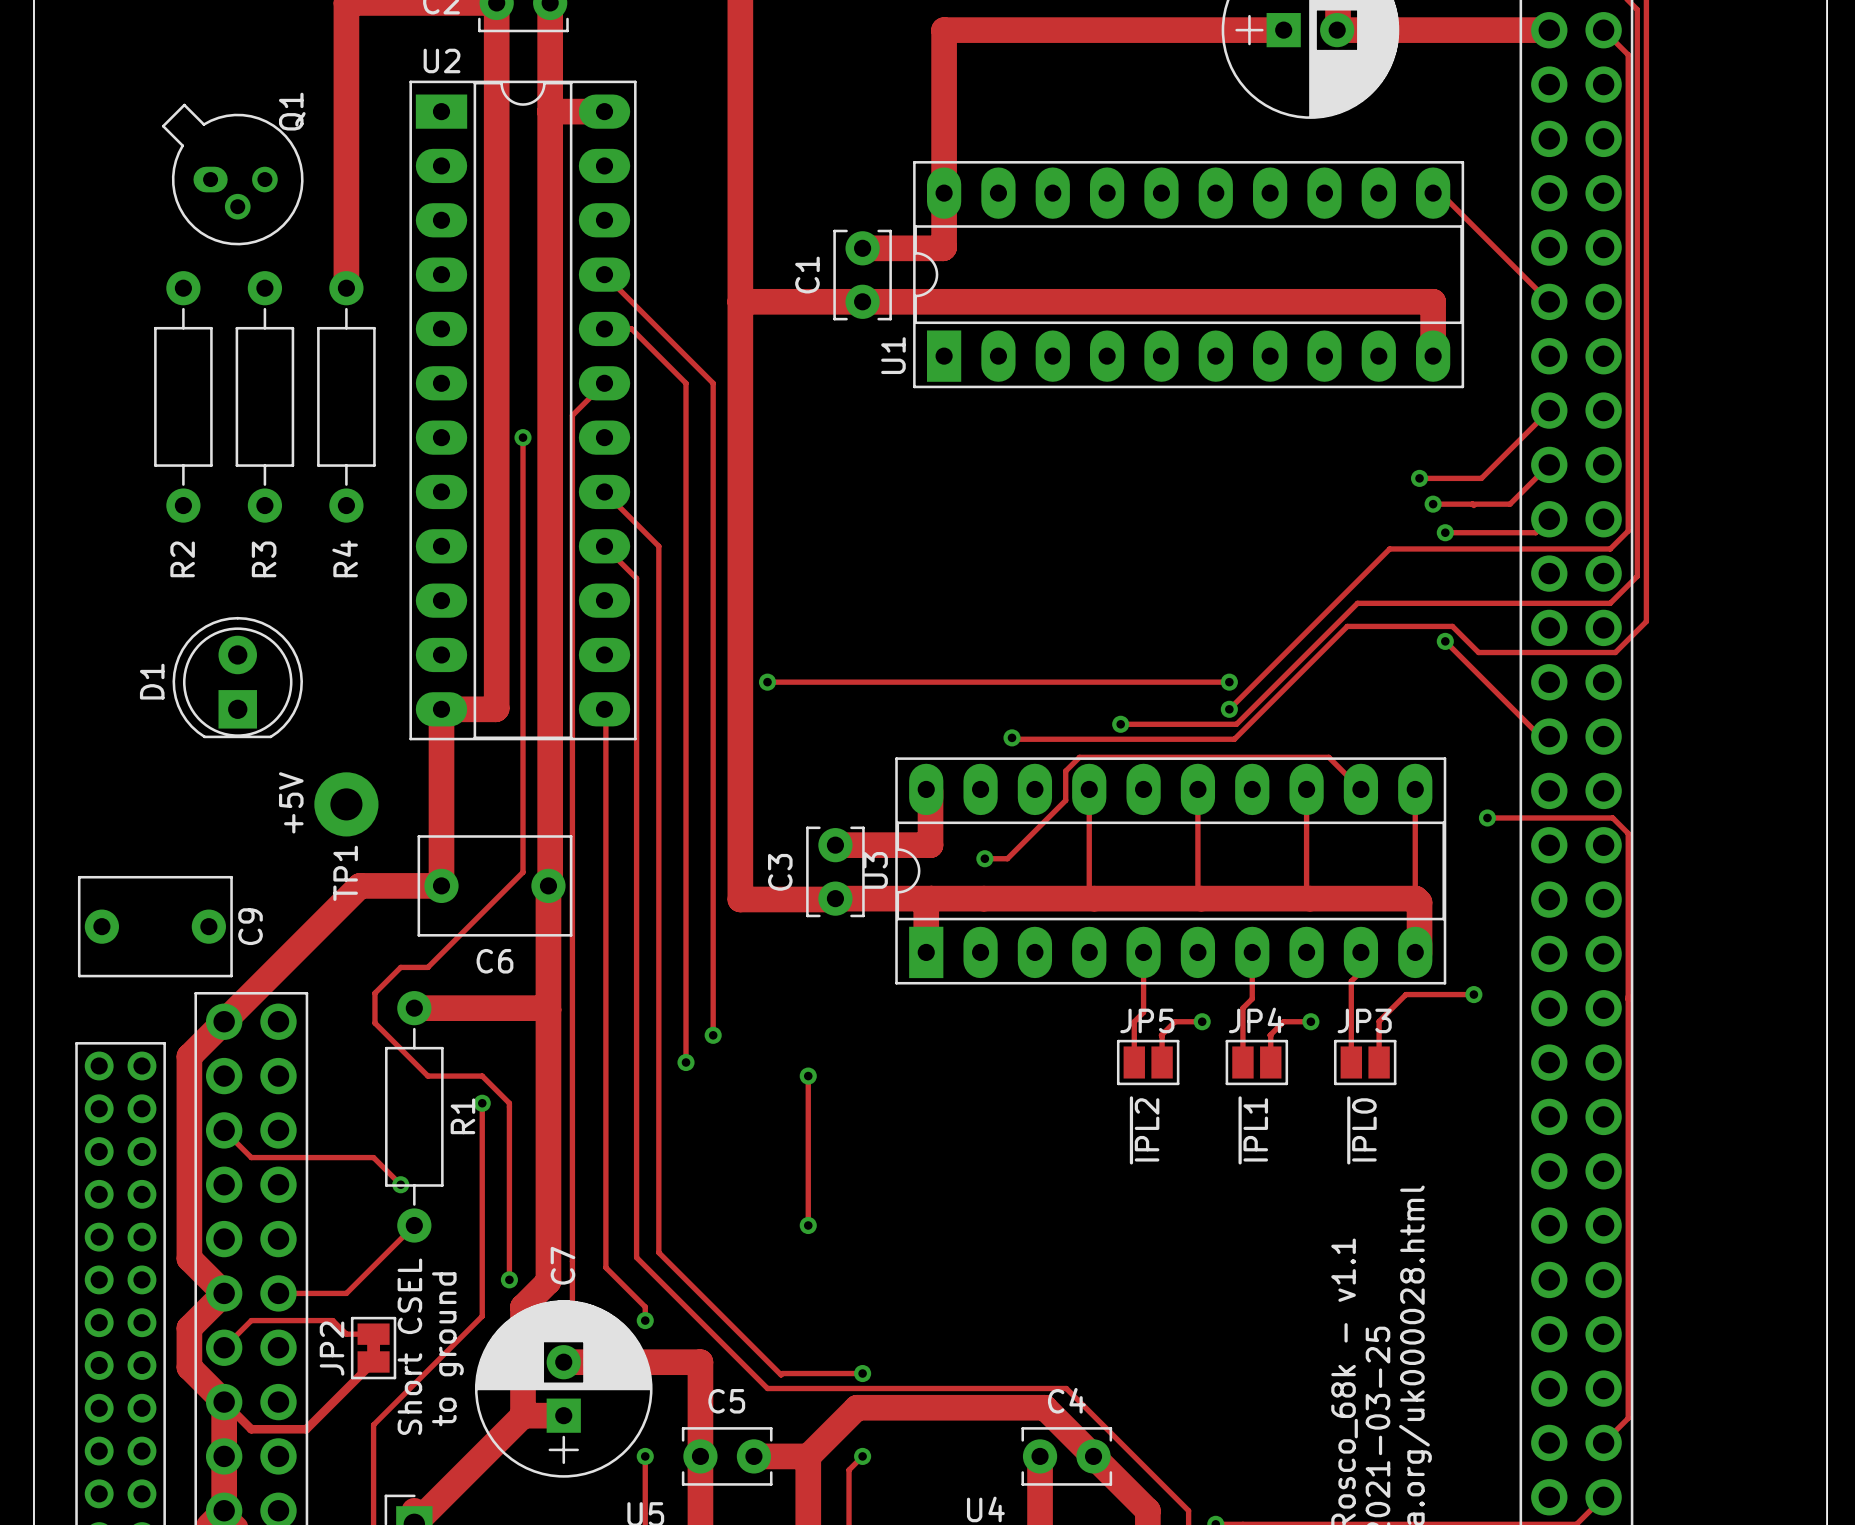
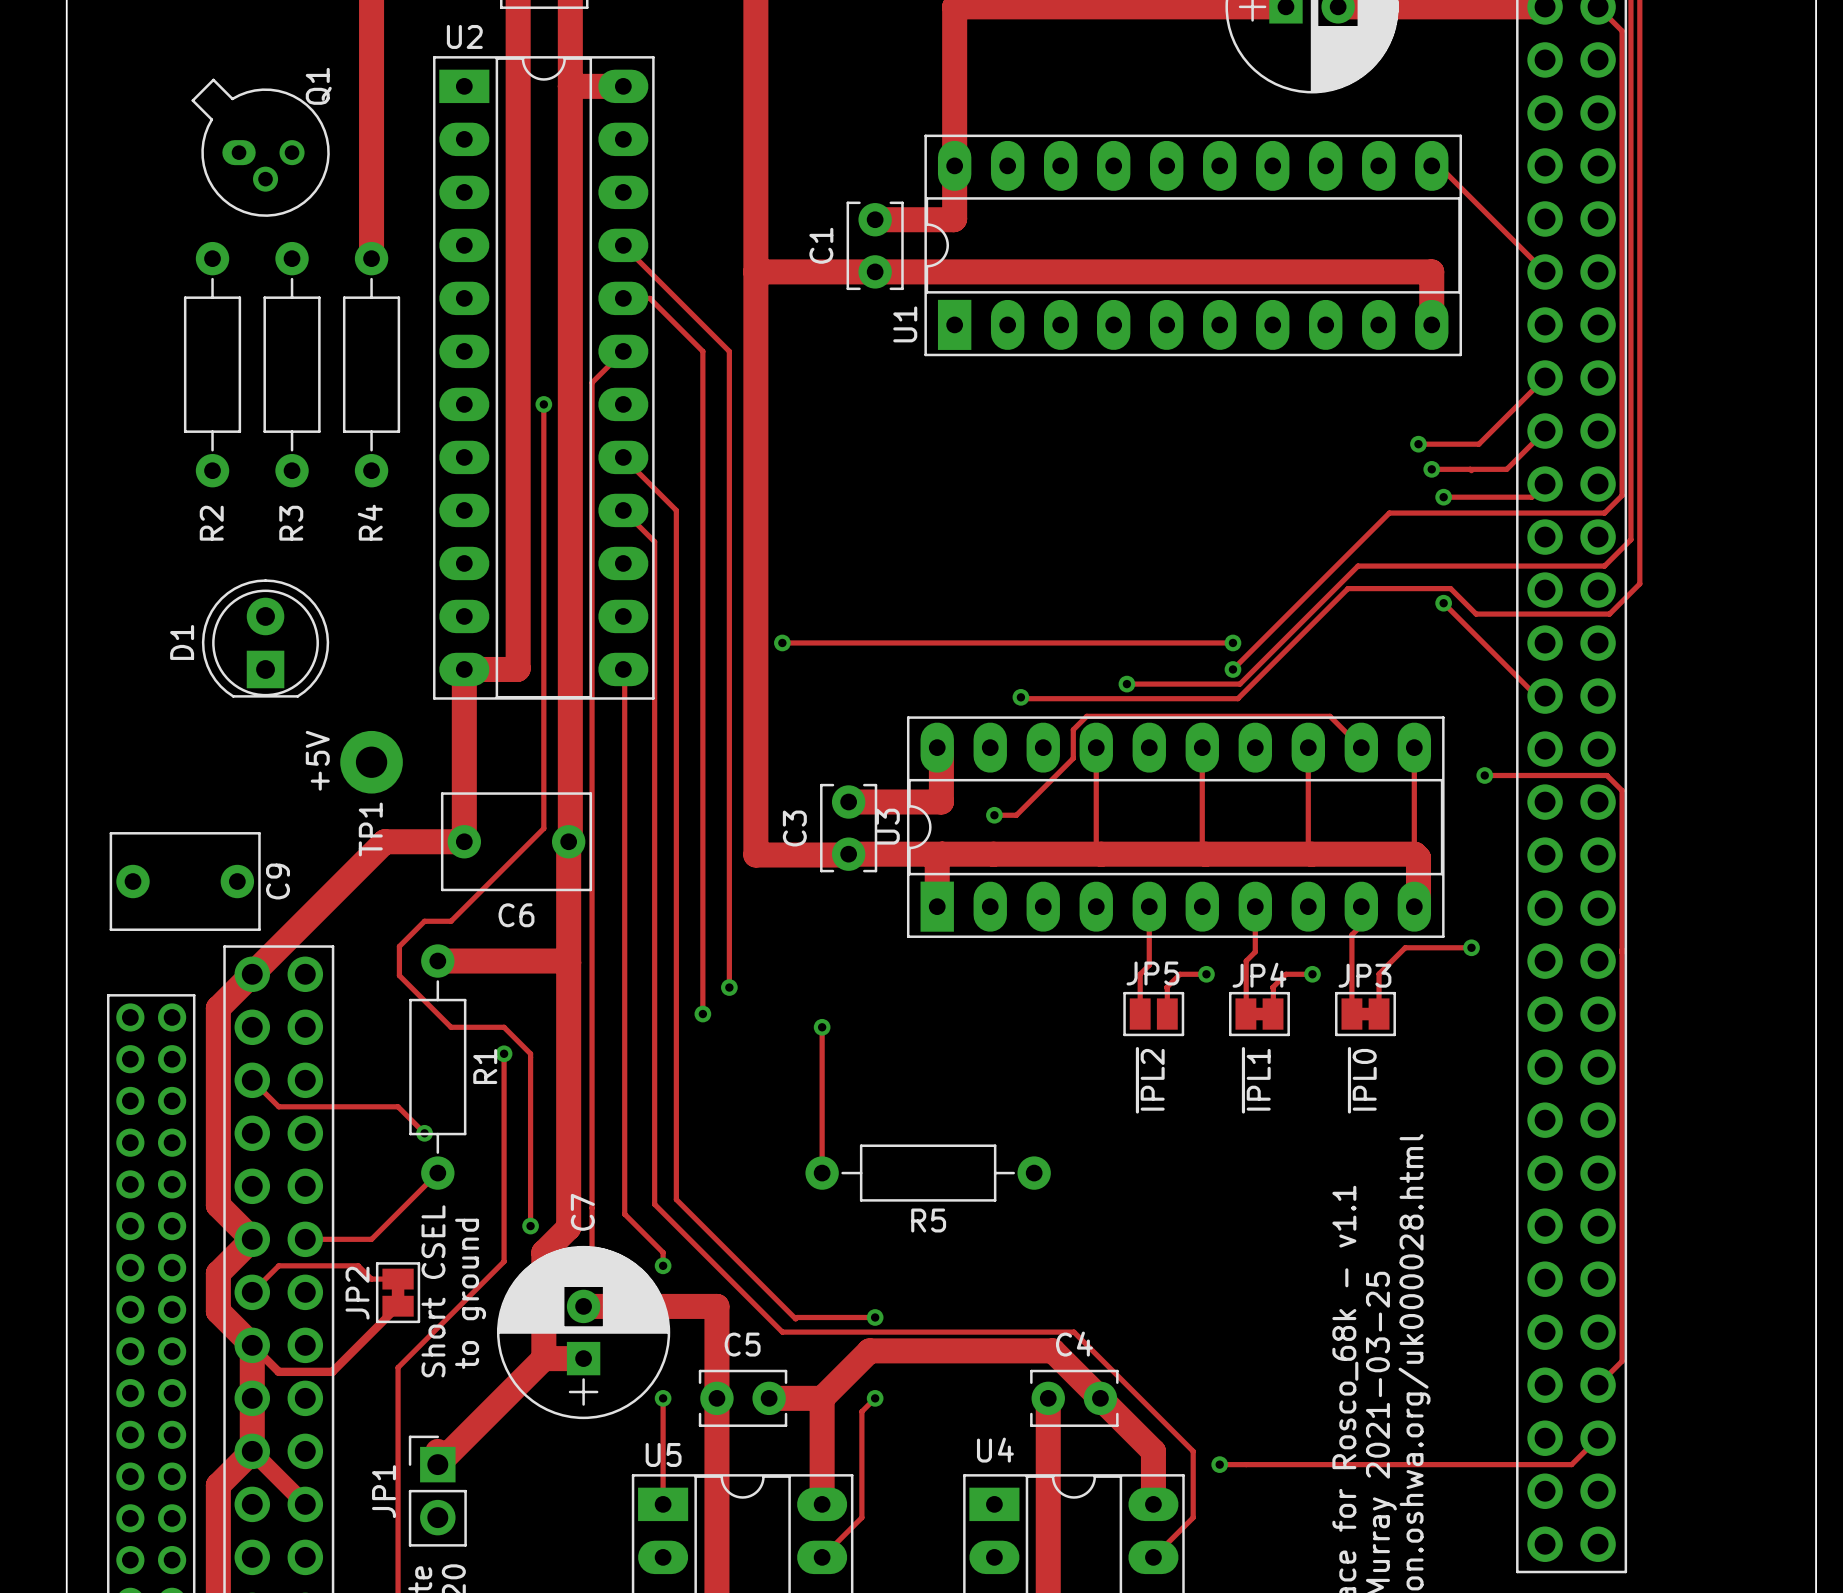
JP4 footprint: [1225, 1039, 1289, 1086] -> [1228, 991, 1290, 1037]
JP3 footprint: [1333, 1039, 1397, 1086] -> [1335, 991, 1396, 1037]
via: (808, 1225) -> none
R5: none -> (928, 1173)

